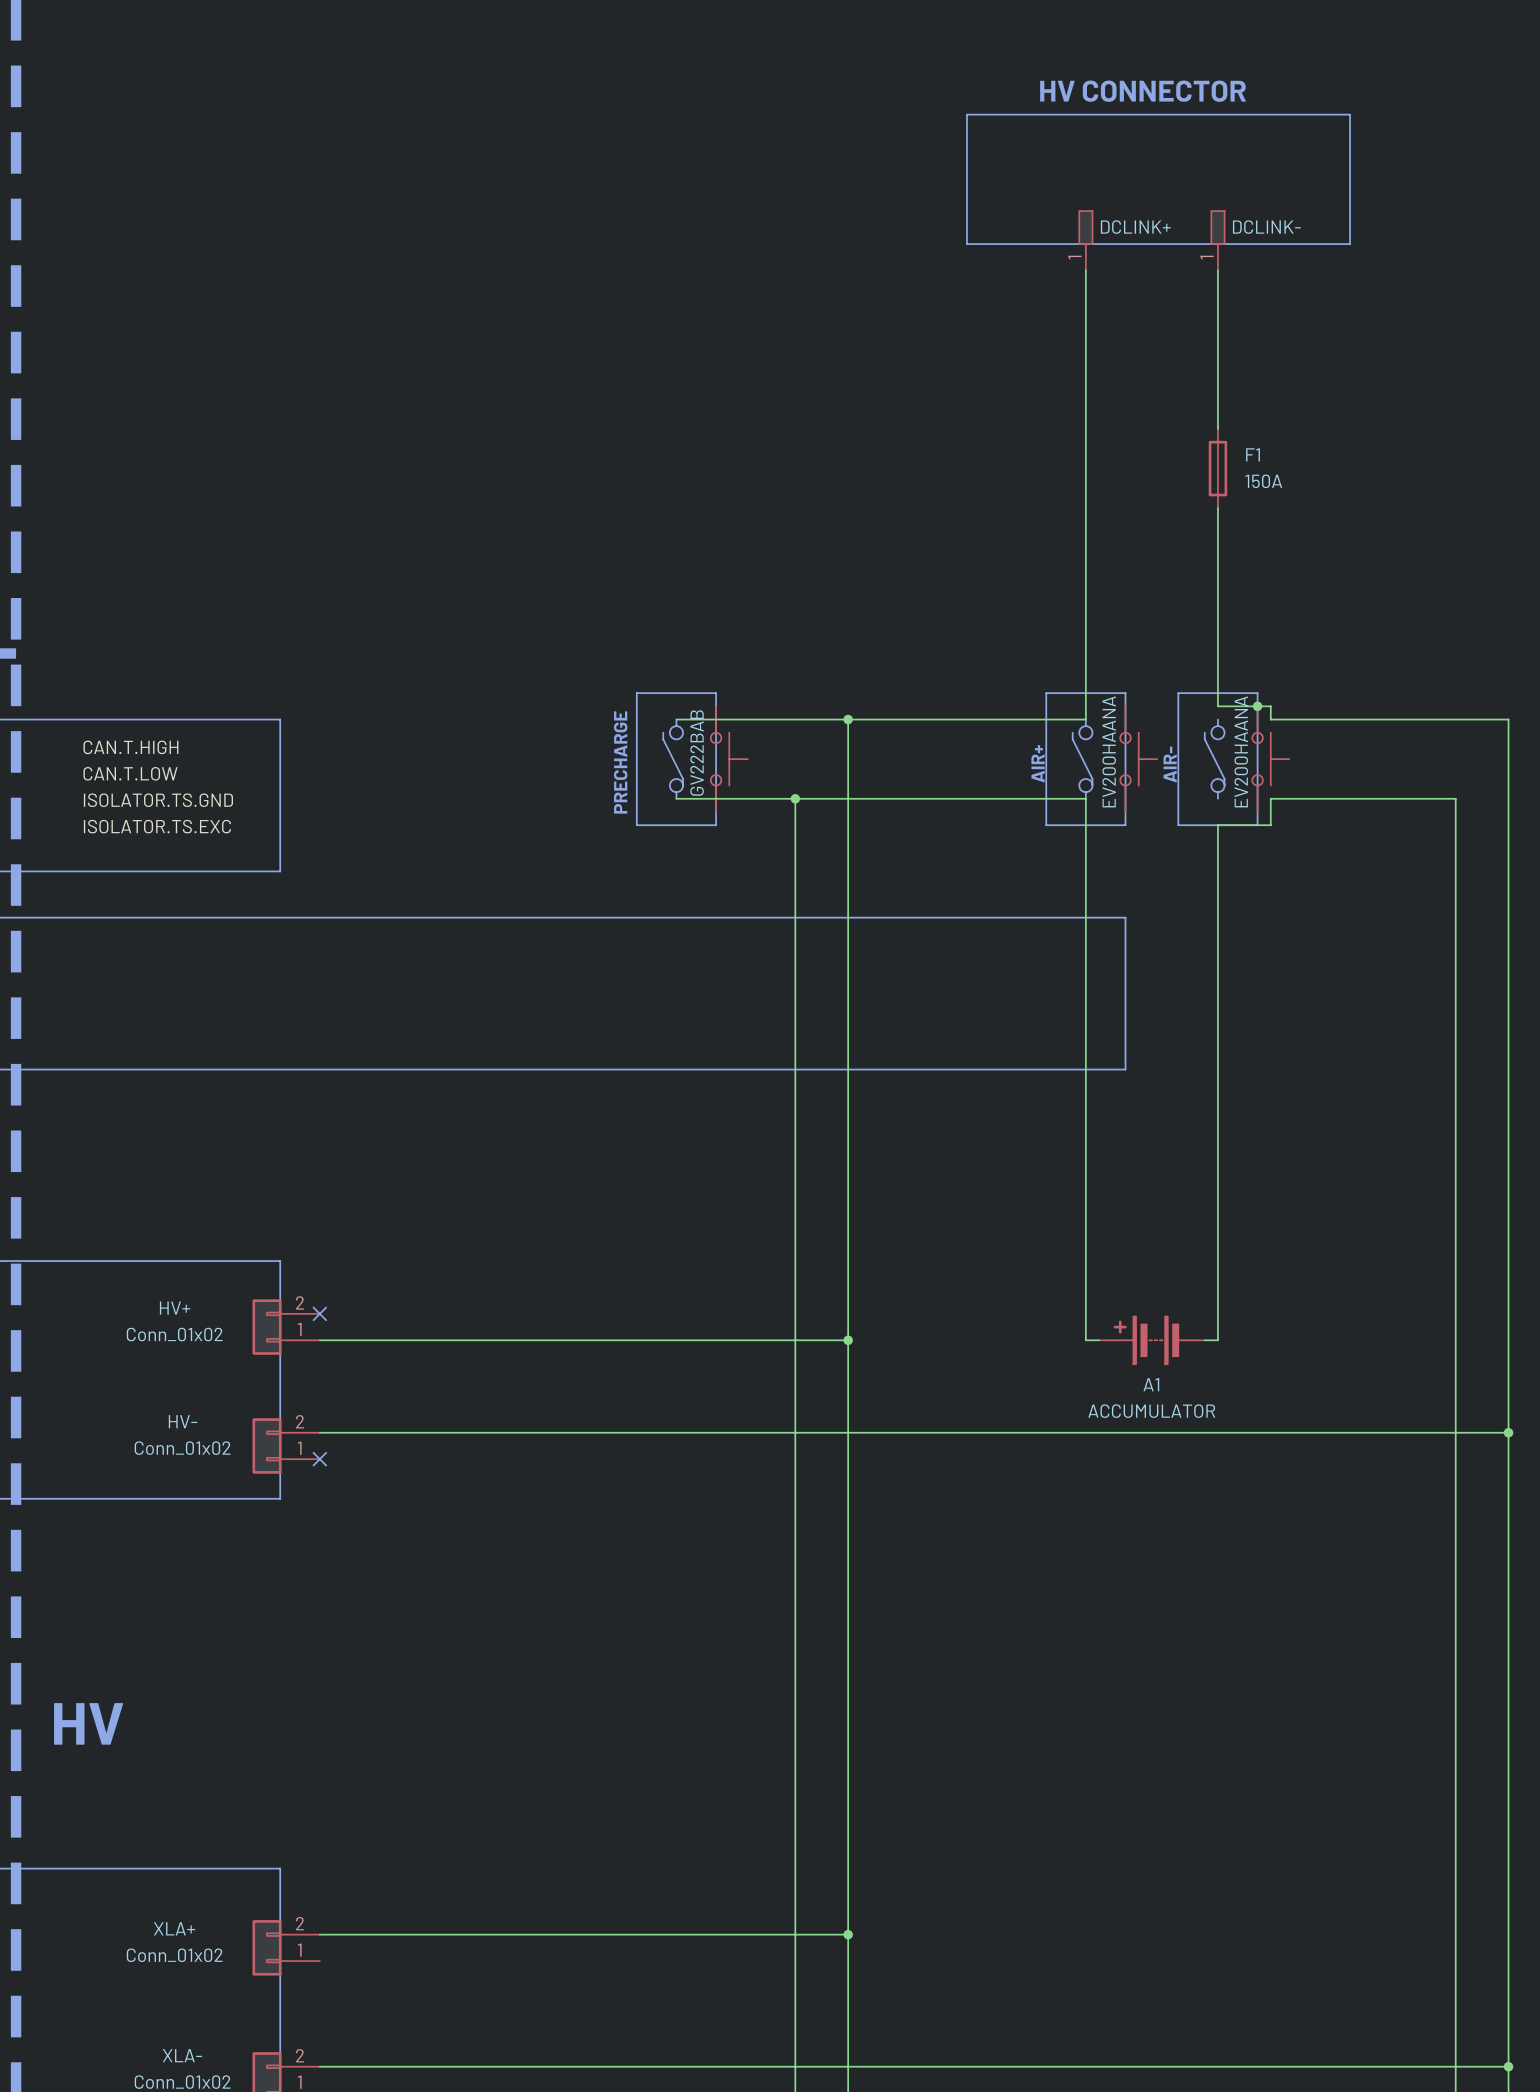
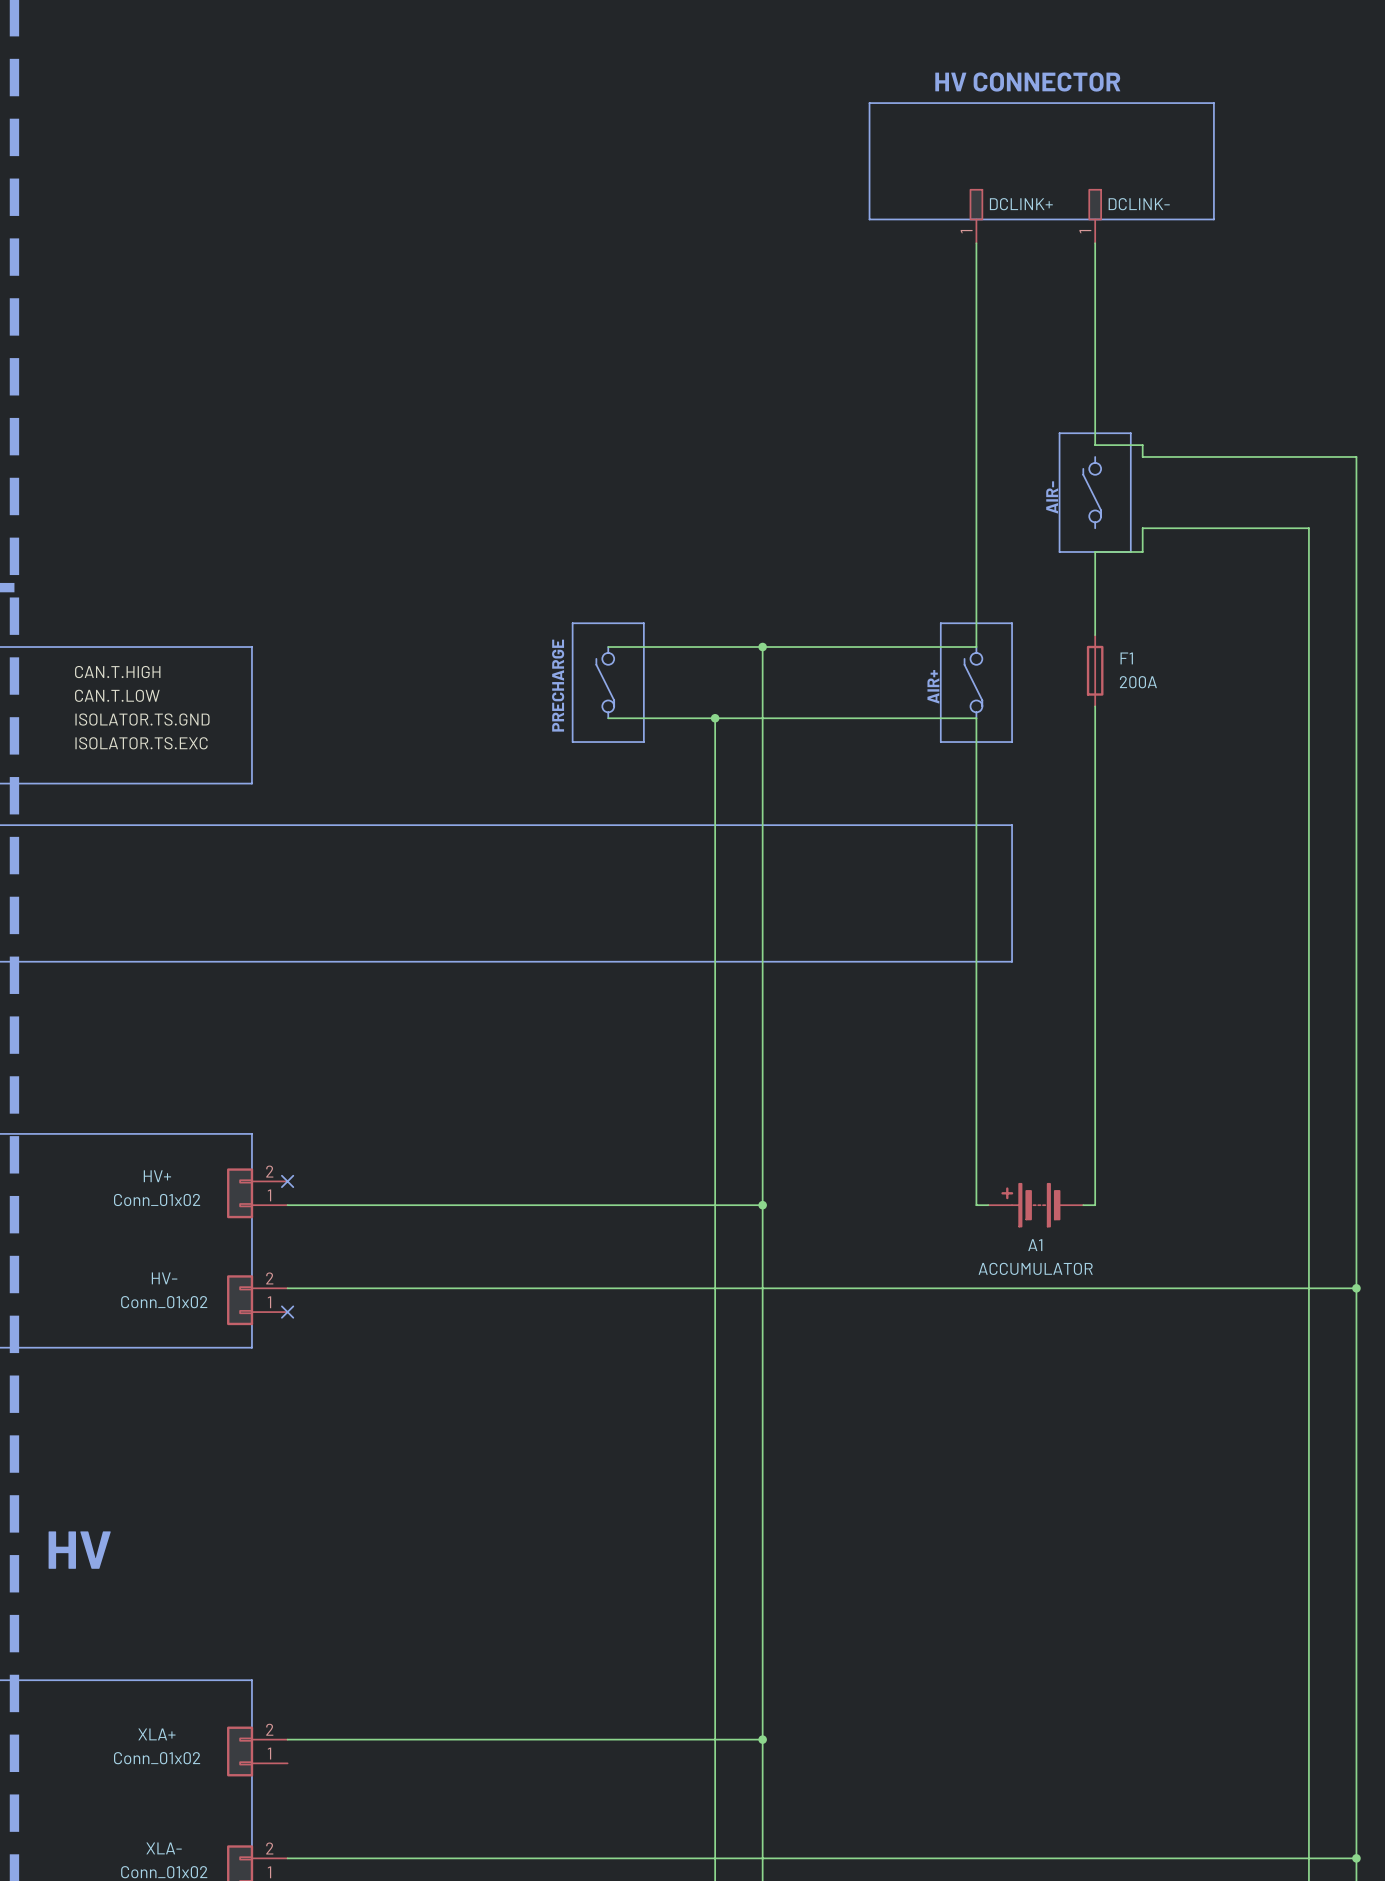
F1 position: (1217, 468) -> (1095, 670)
F1 value: 150A (1263, 481) -> 200A (1138, 682)
wire: (1217, 508) (1217, 613) -> none
drawing: none -> [1089, 462, 1102, 475]
drawing: none -> [1089, 510, 1102, 523]
line: (1178, 693) (1257, 693) (1257, 825) (1178, 825) (1178, 693) -> (1059, 433) (1130, 433) (1130, 551) (1059, 551) (1059, 433)
wire: (1217, 706) (1270, 706) (1270, 719) (1508, 719) -> (1095, 385) (1095, 445) (1142, 445) (1142, 456) (1356, 456) (1356, 647)
junction: (1257, 706) -> none
line: (1217, 719) (1217, 726) -> (1095, 456) (1095, 462)
drawing: [1211, 726, 1225, 740] -> none
line: (1204, 732) (1204, 739) (1224, 778) (1224, 785) -> (1083, 468) (1083, 474) (1101, 510) (1101, 516)
part: GV222BAB (729, 759) -> none
part: EV200HAANA (1138, 759) -> none
part: EV200HAANA (1270, 759) -> none
text position: AIR- (1170, 764) -> AIR- (1052, 497)
drawing: [1211, 778, 1225, 793] -> none
wire: none -> (1095, 706) (1095, 742)
line: (1217, 792) (1217, 798) -> (1095, 522) (1095, 528)
wire: (1455, 798) (1270, 798) (1270, 825) (1217, 825) -> (1308, 718) (1308, 528) (1142, 528) (1142, 551) (1095, 551)

